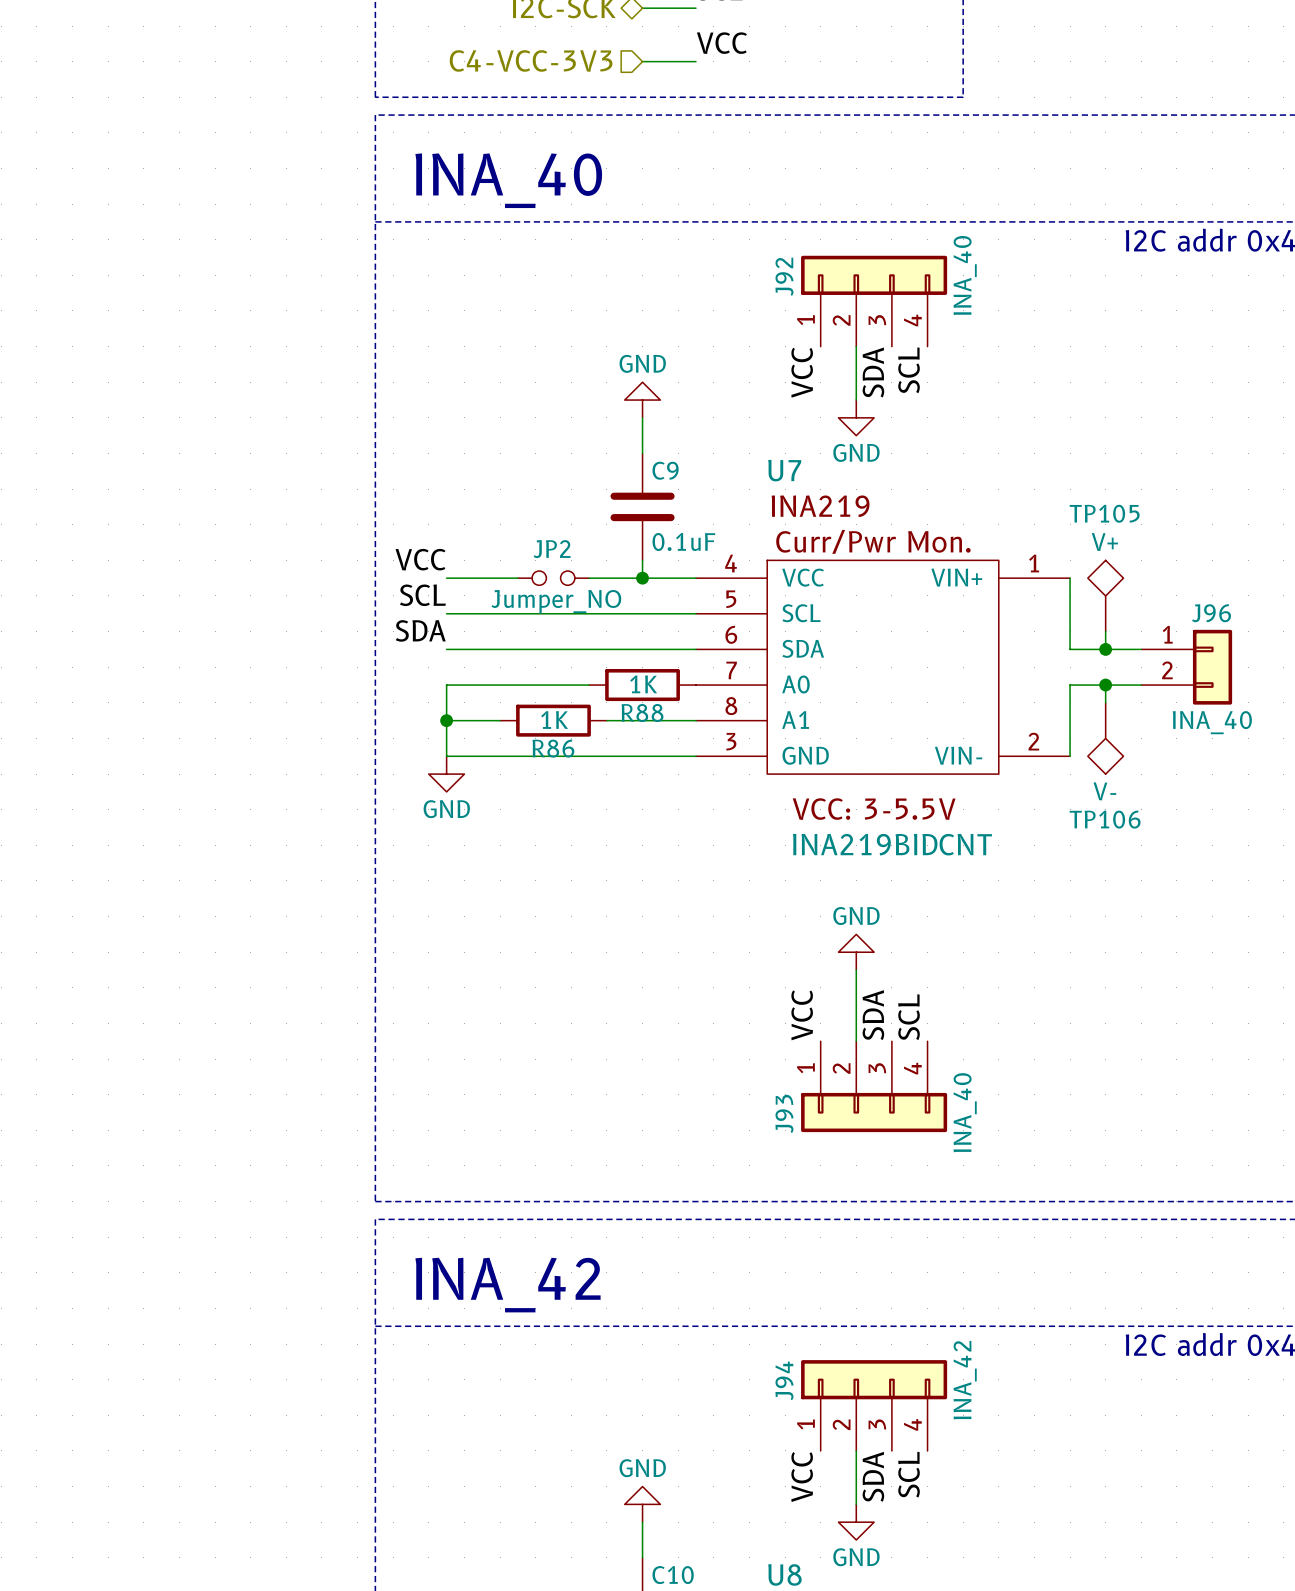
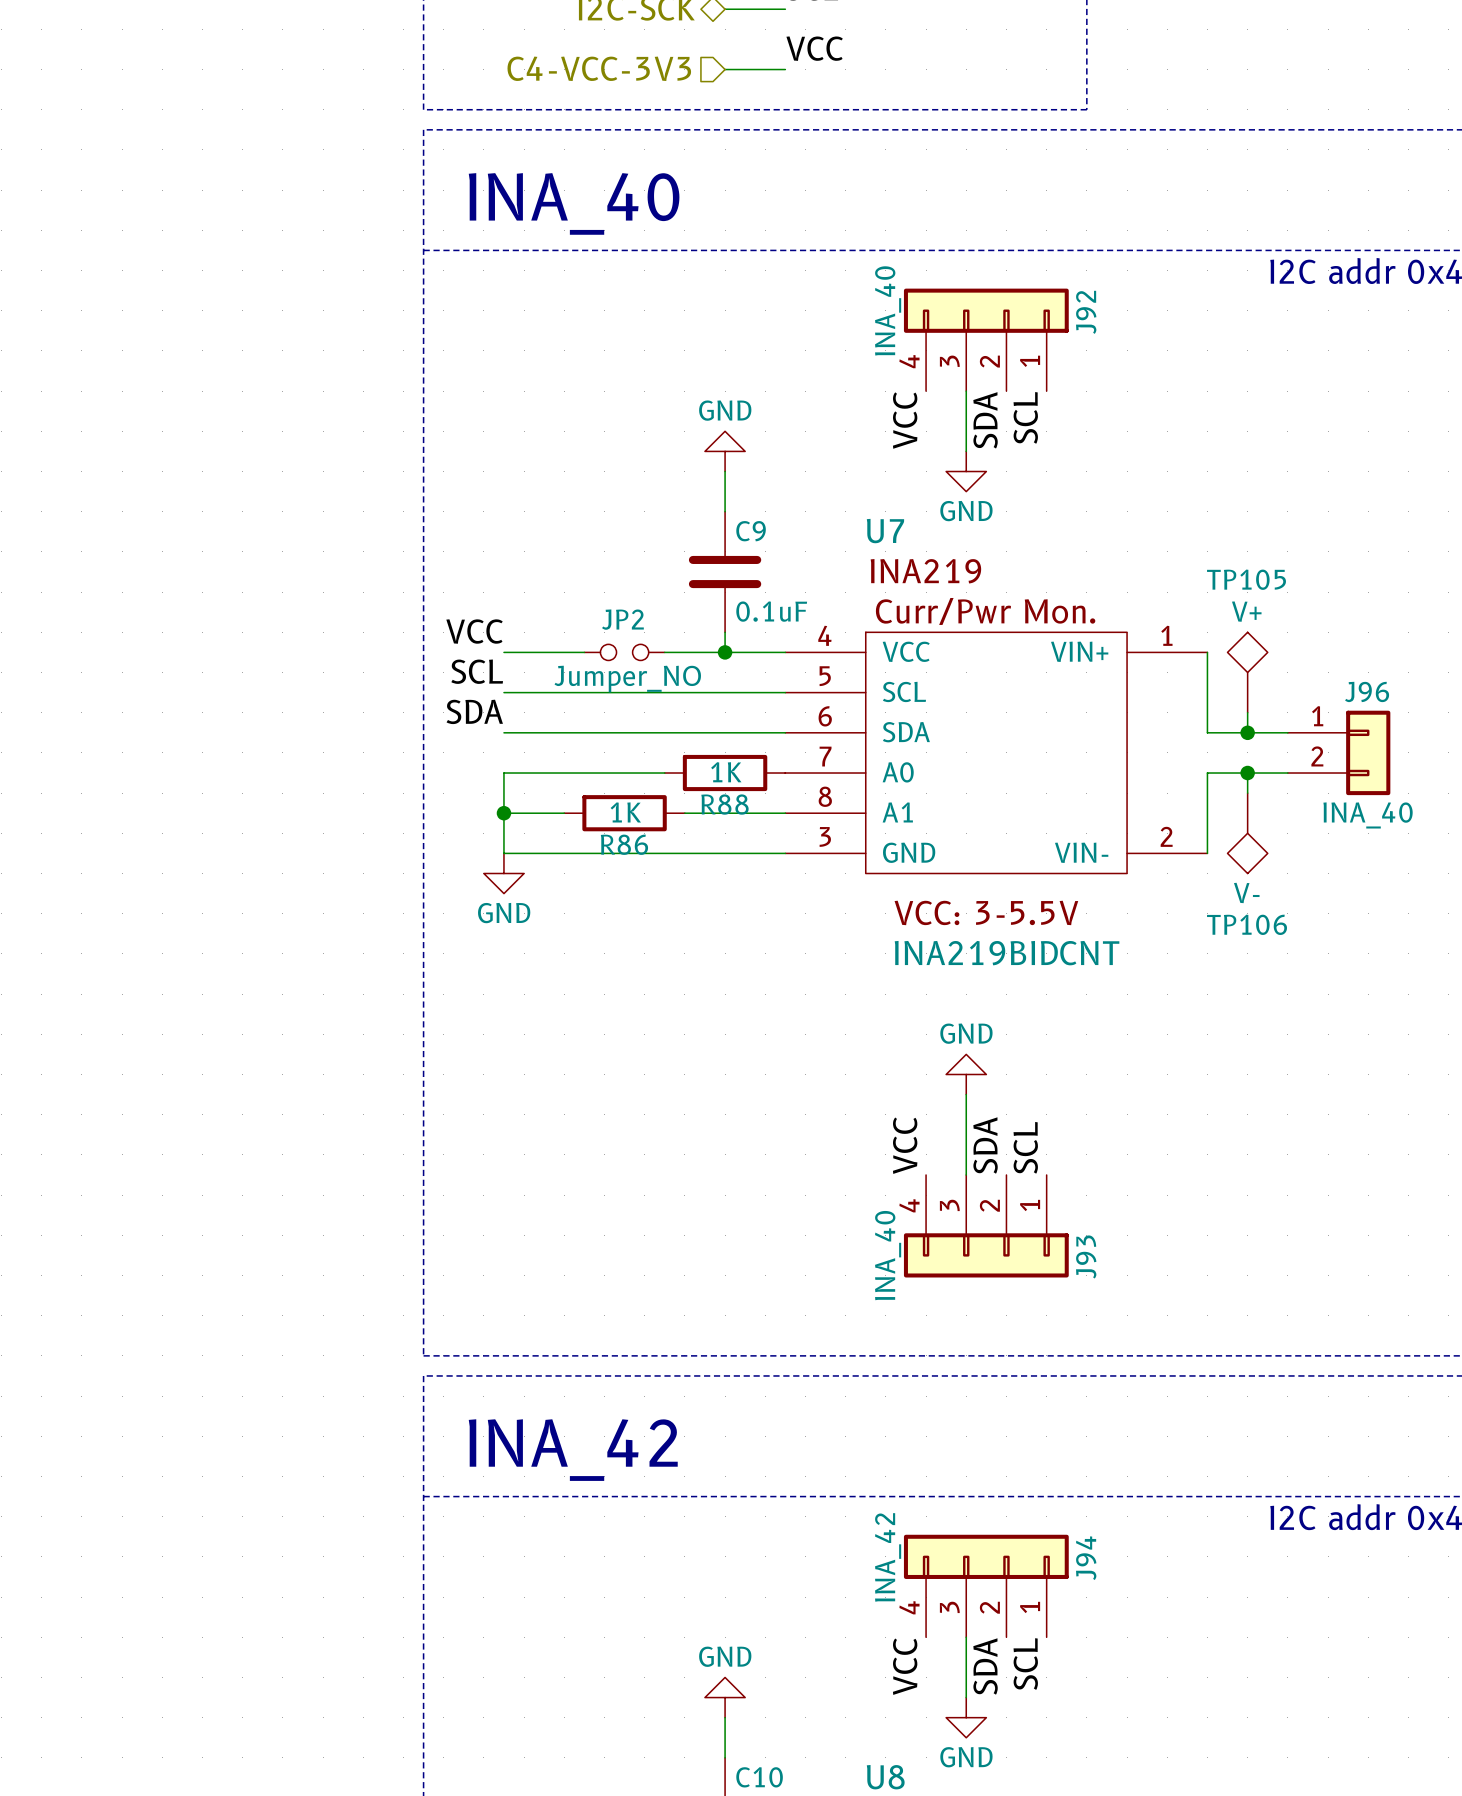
J92 flip: as is (874, 275) -> left-right (986, 310)
J93 flip: as is (874, 1112) -> left-right (986, 1255)
J94 flip: as is (874, 1379) -> left-right (986, 1556)

